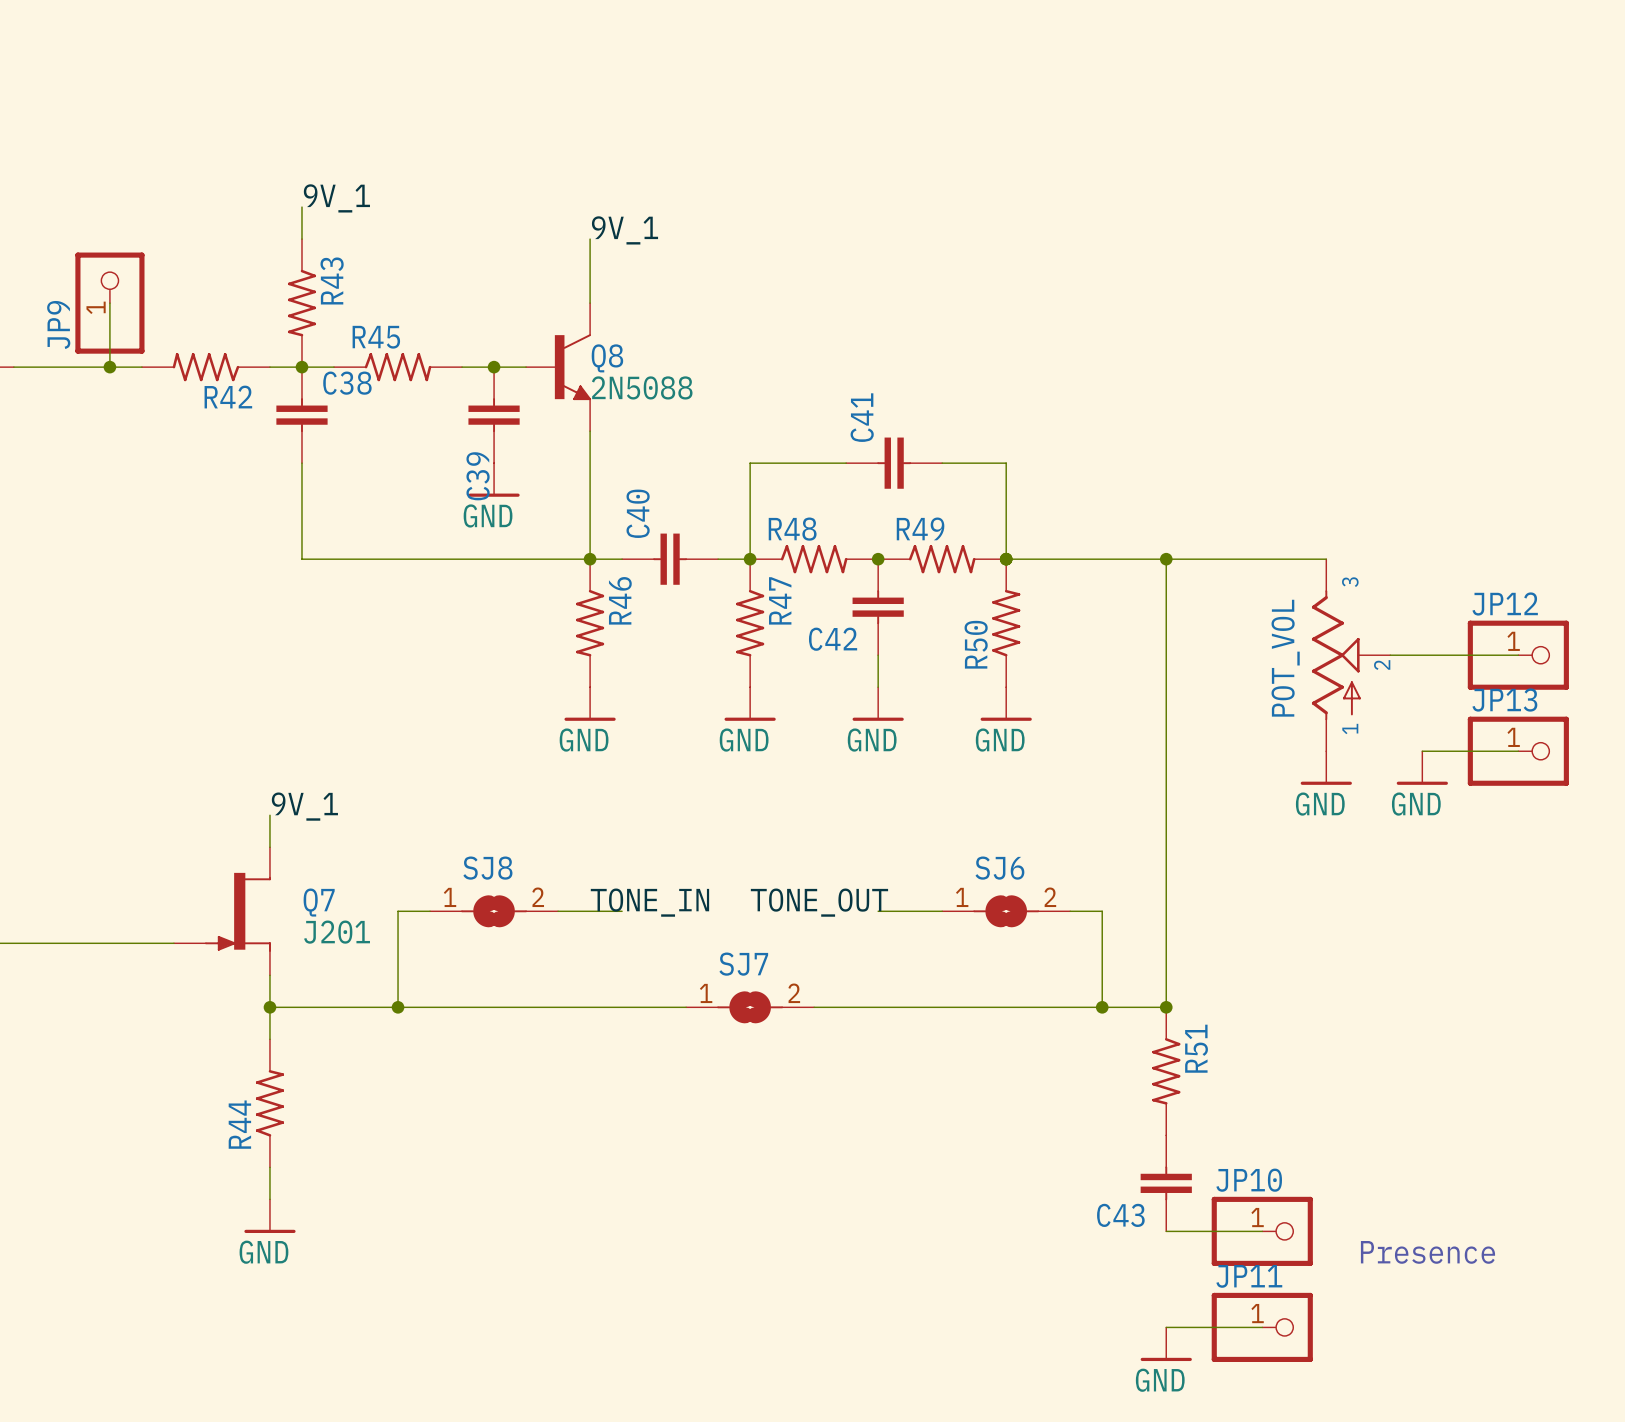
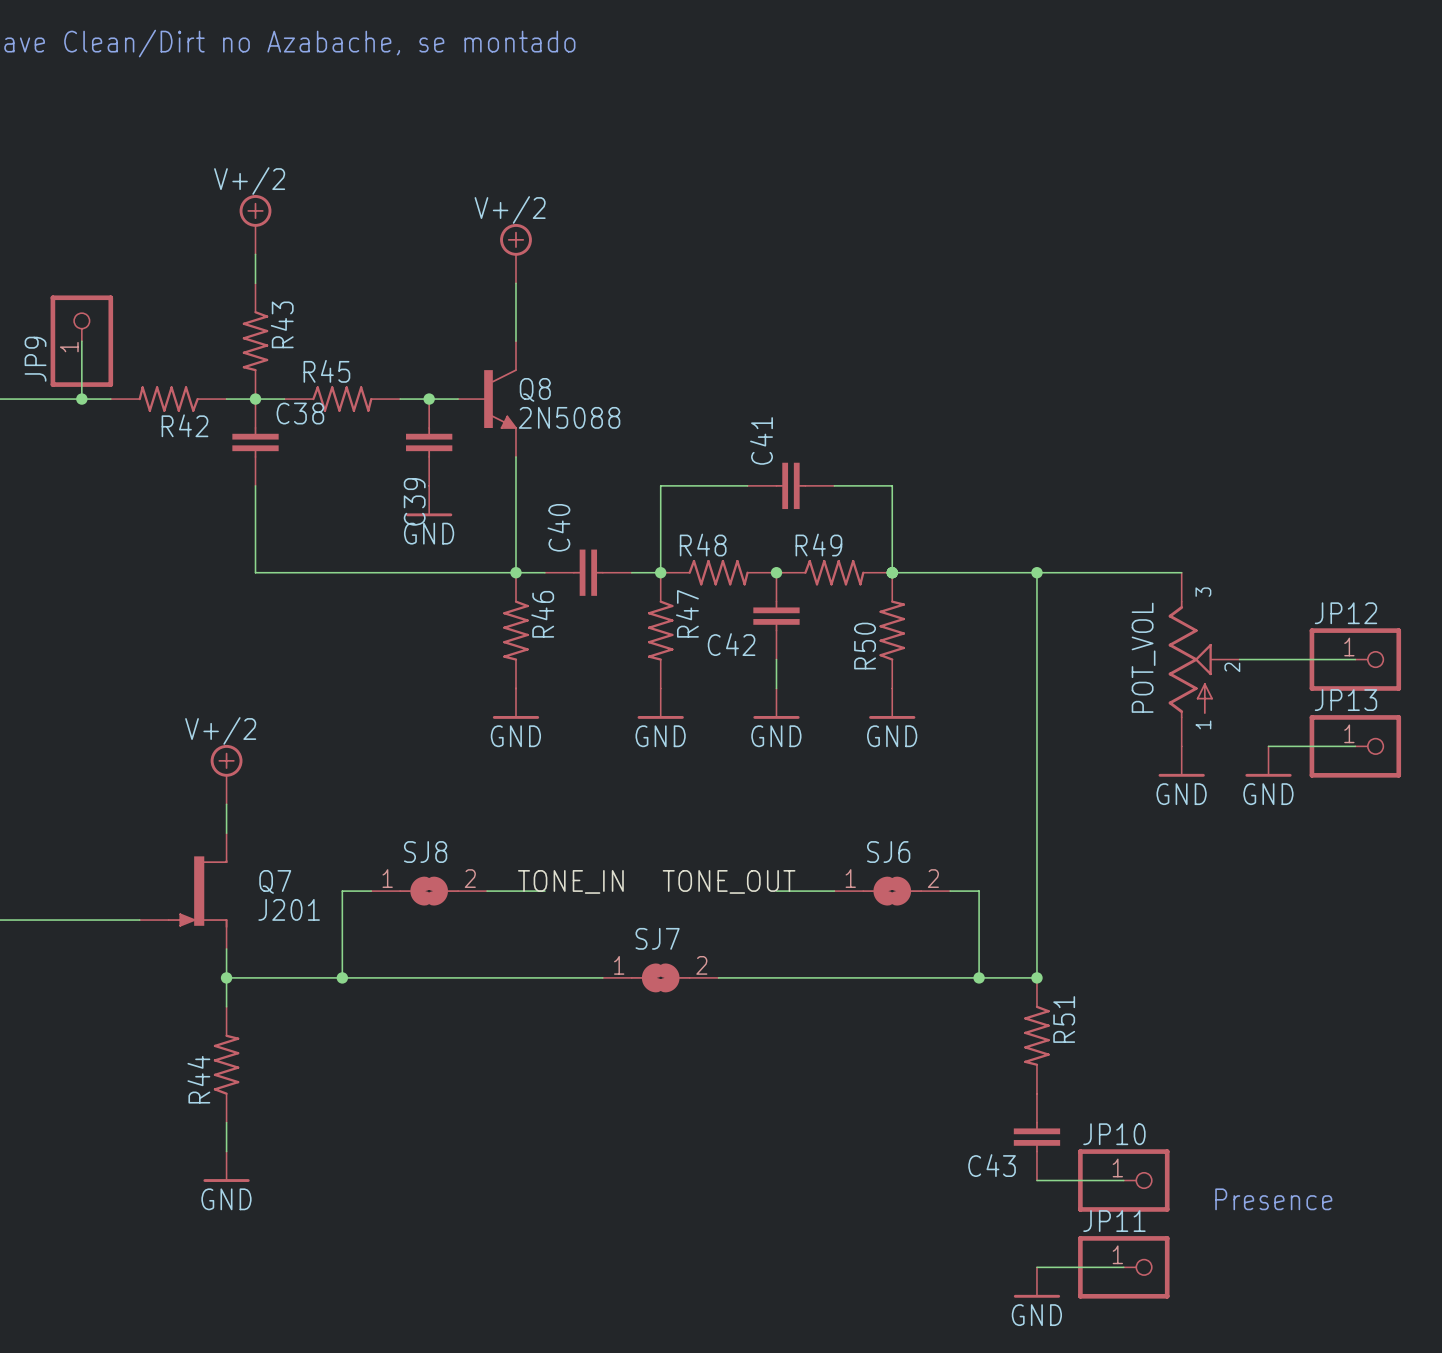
power symbol: none -> V+/2 (255, 224)
label: 9V_1 (336, 198) -> none
power symbol: none -> V+/2 (515, 253)
label: 9V_1 (624, 230) -> none
power symbol: none -> V+/2 (226, 774)
label: 9V_1 (304, 806) -> none

